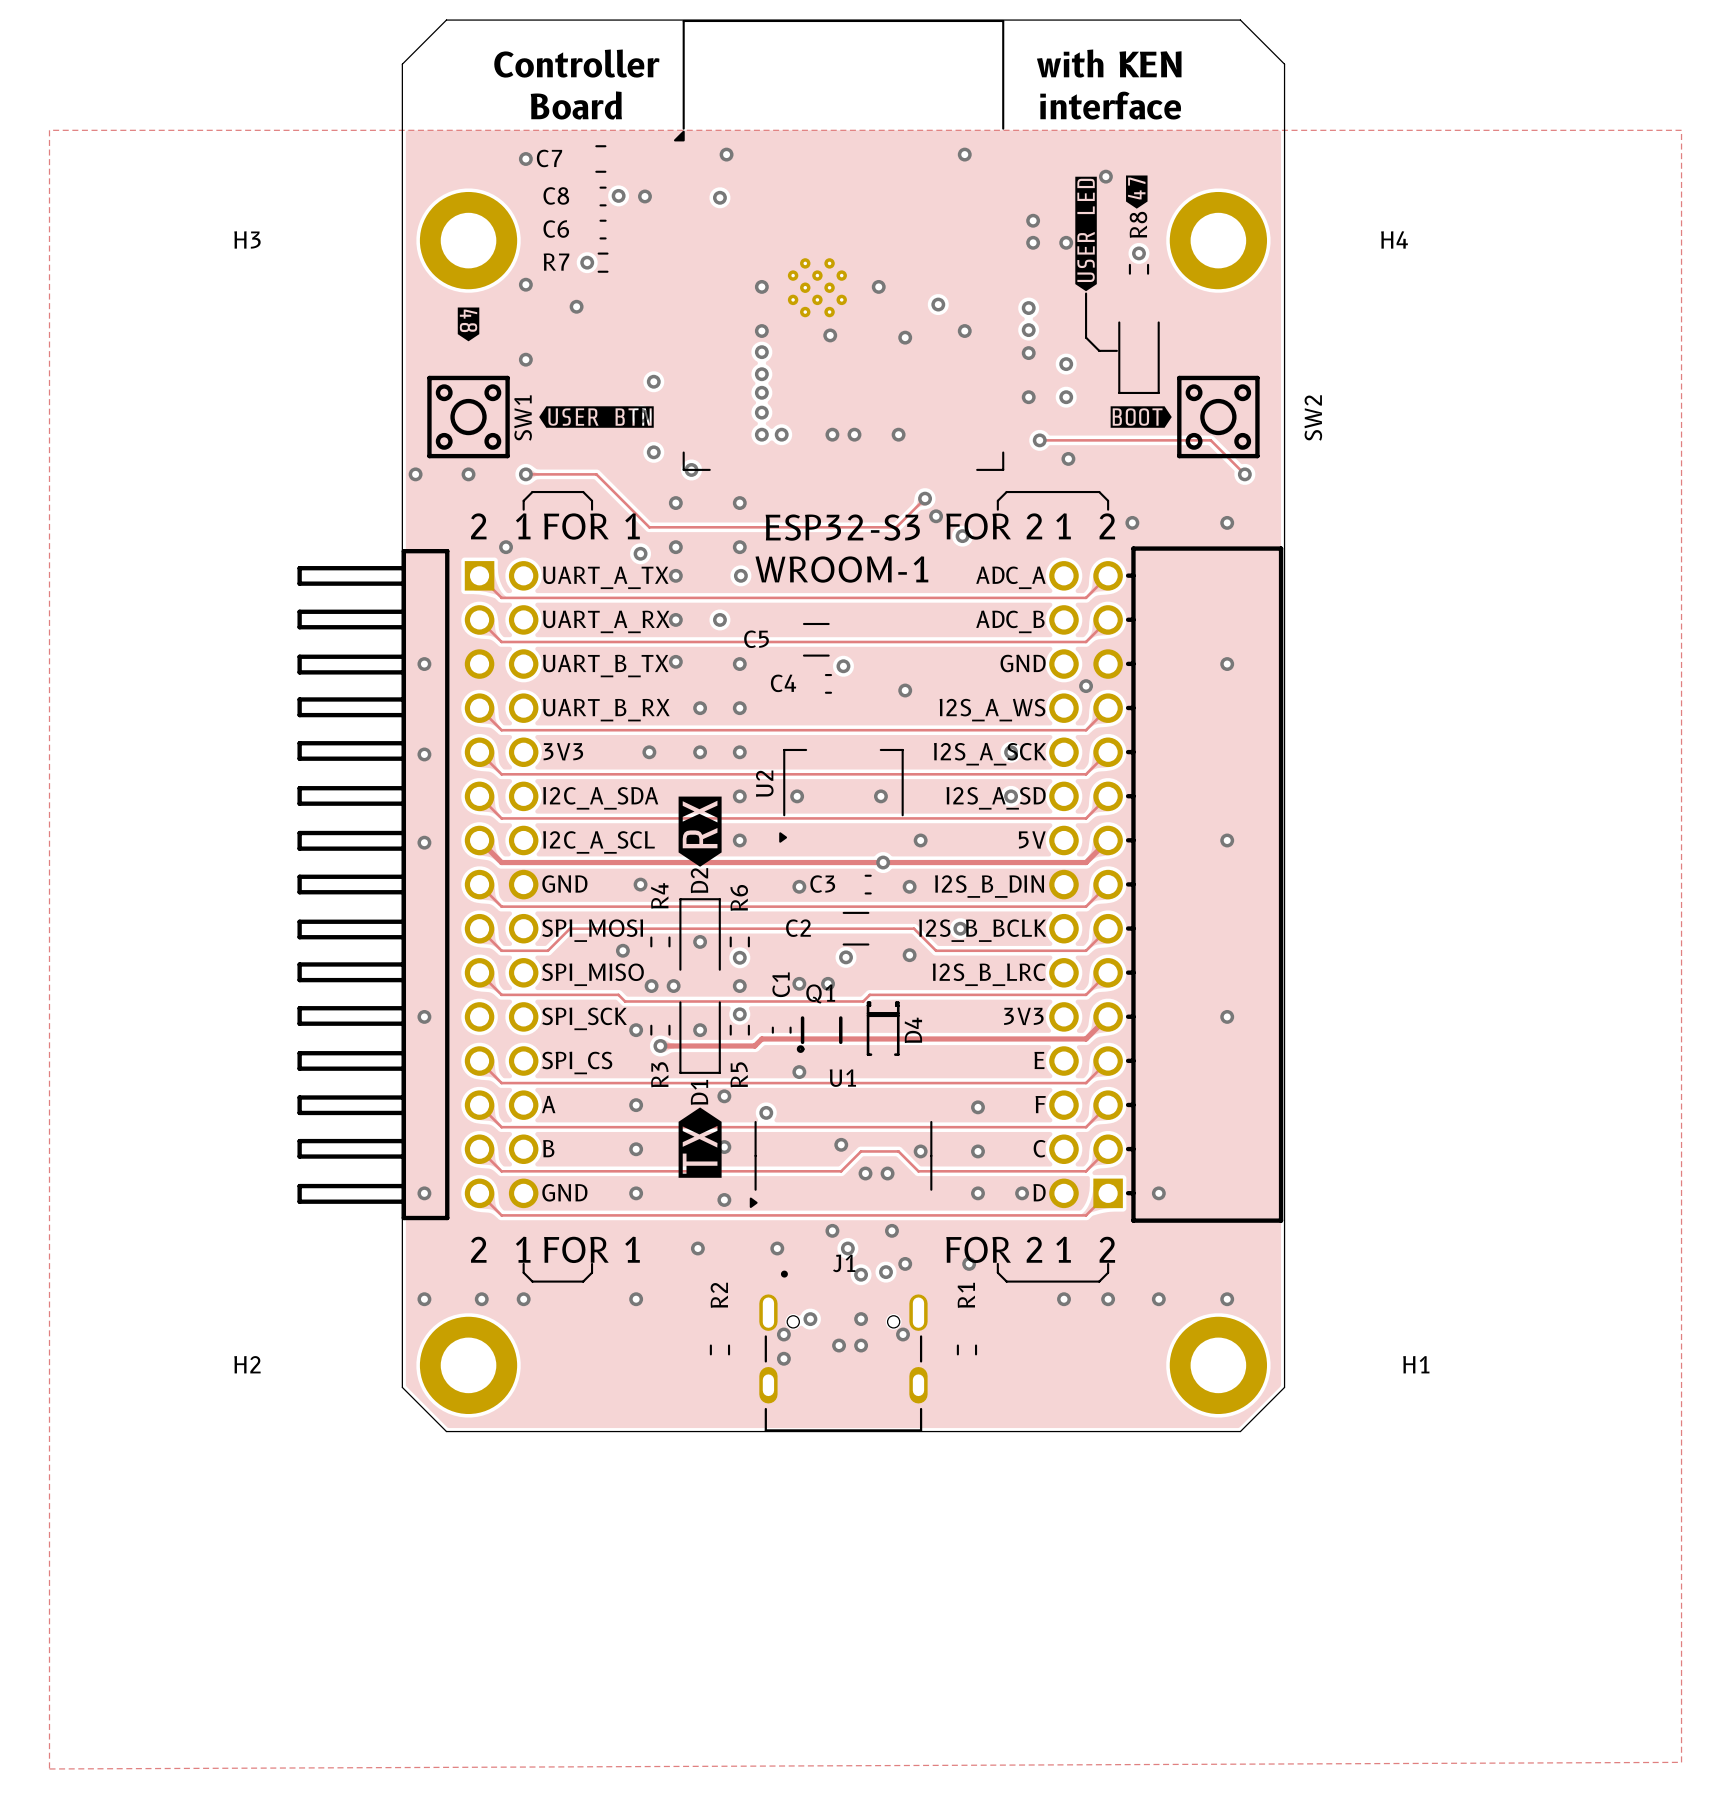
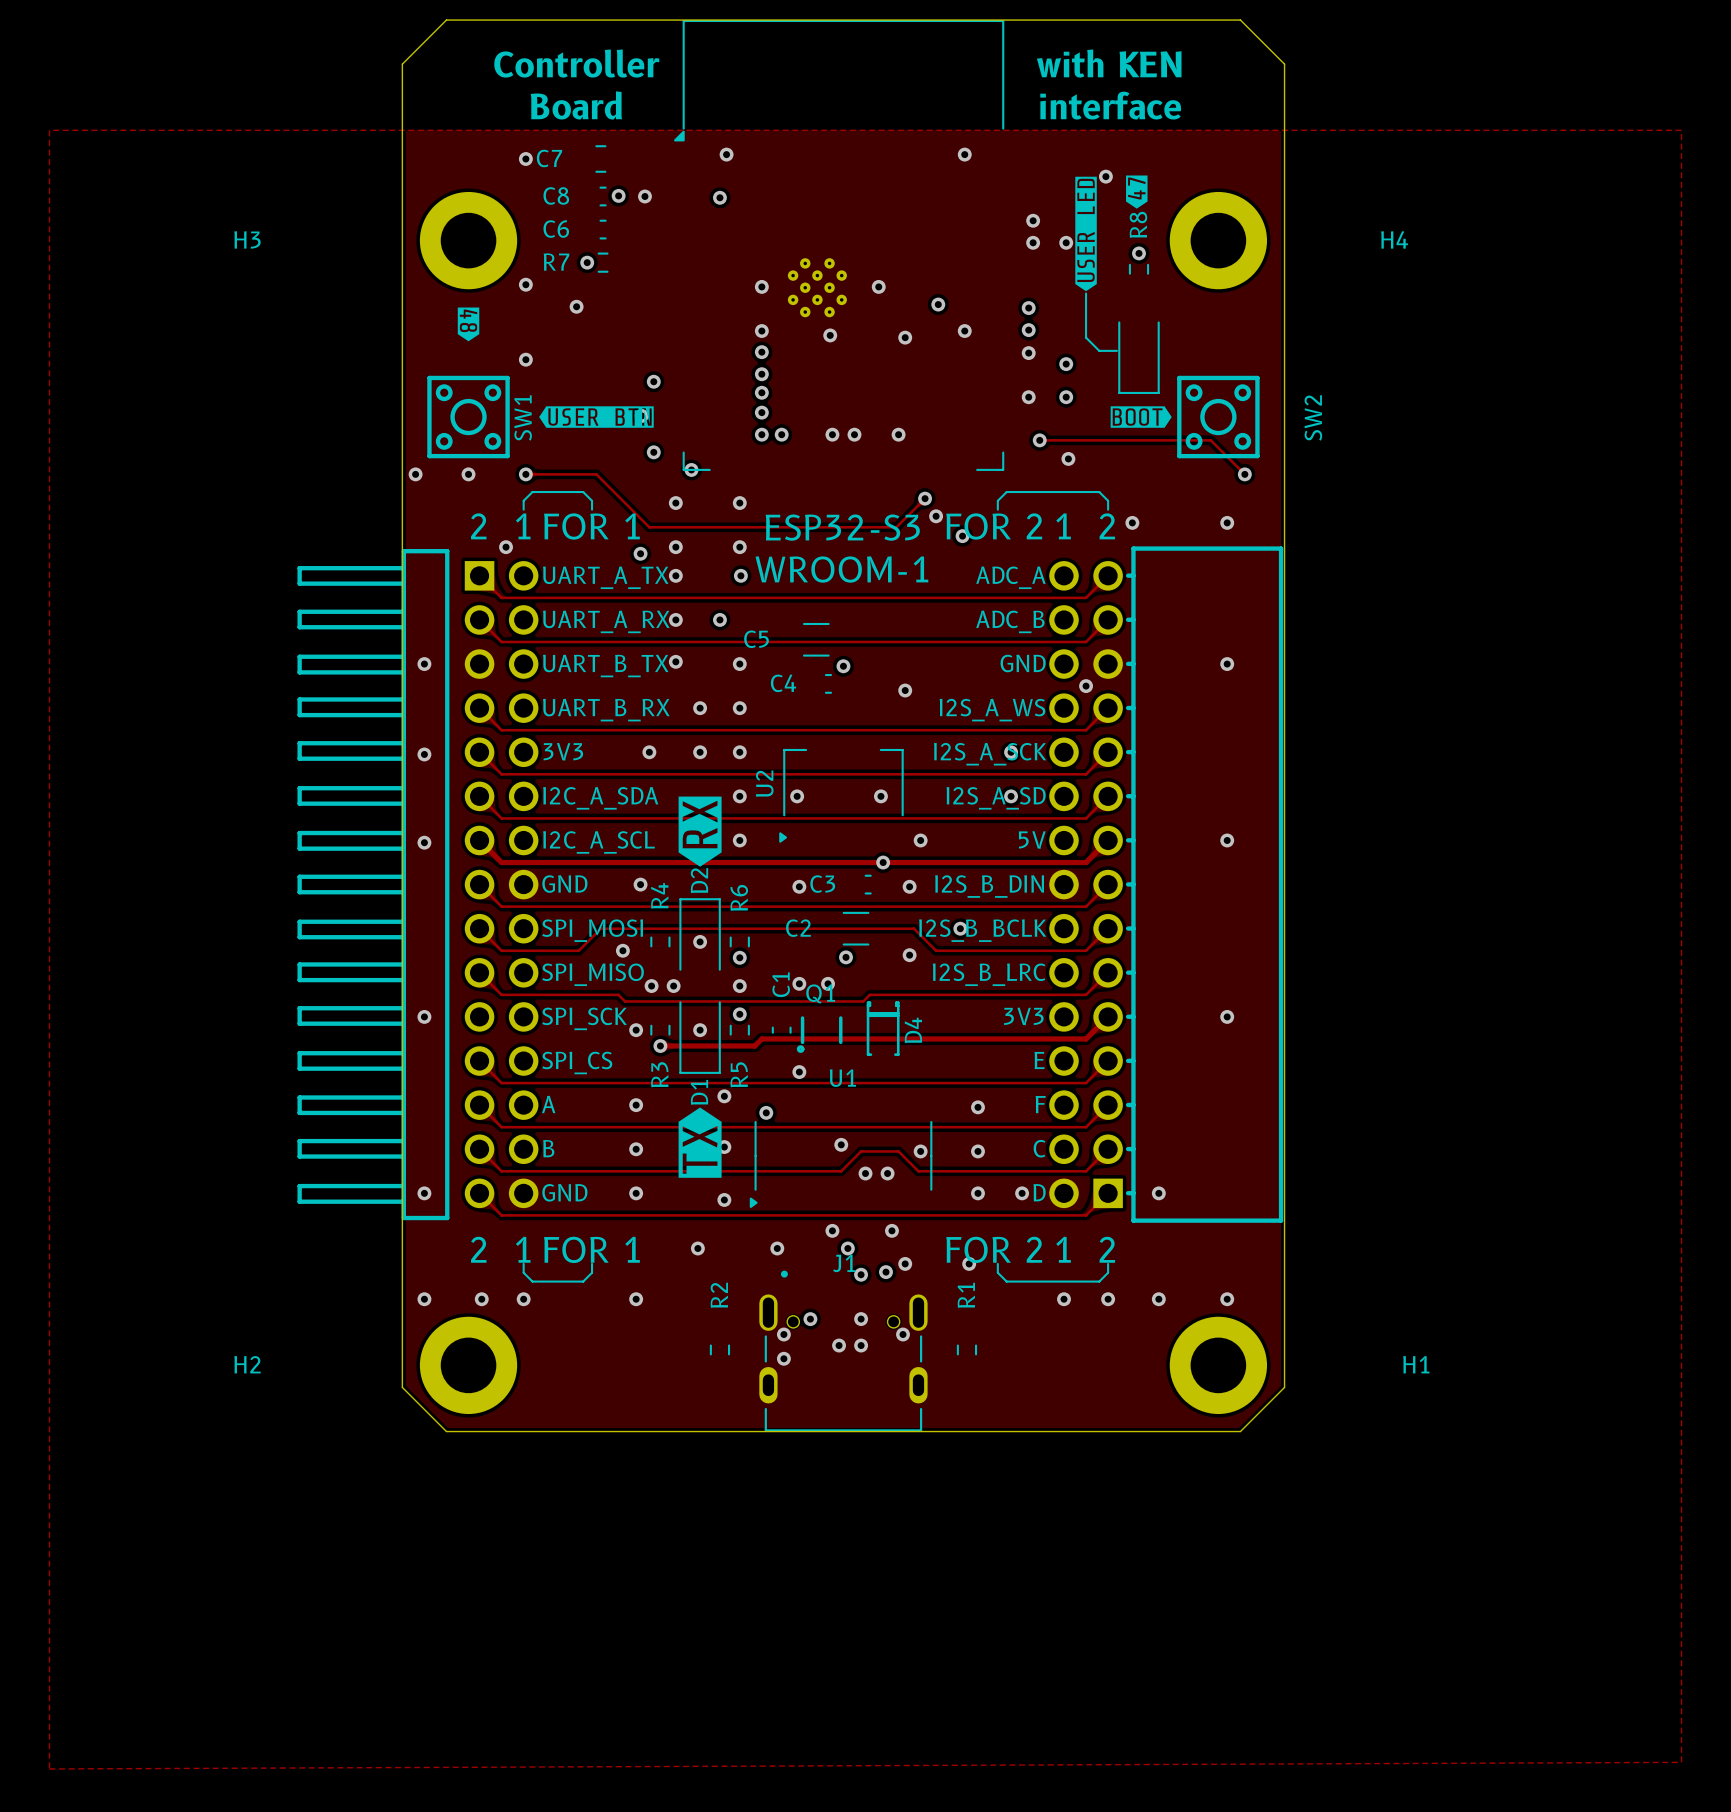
track: (600, 928) (569, 928) (547, 950) -> (600, 928) (578, 950) (547, 950)

